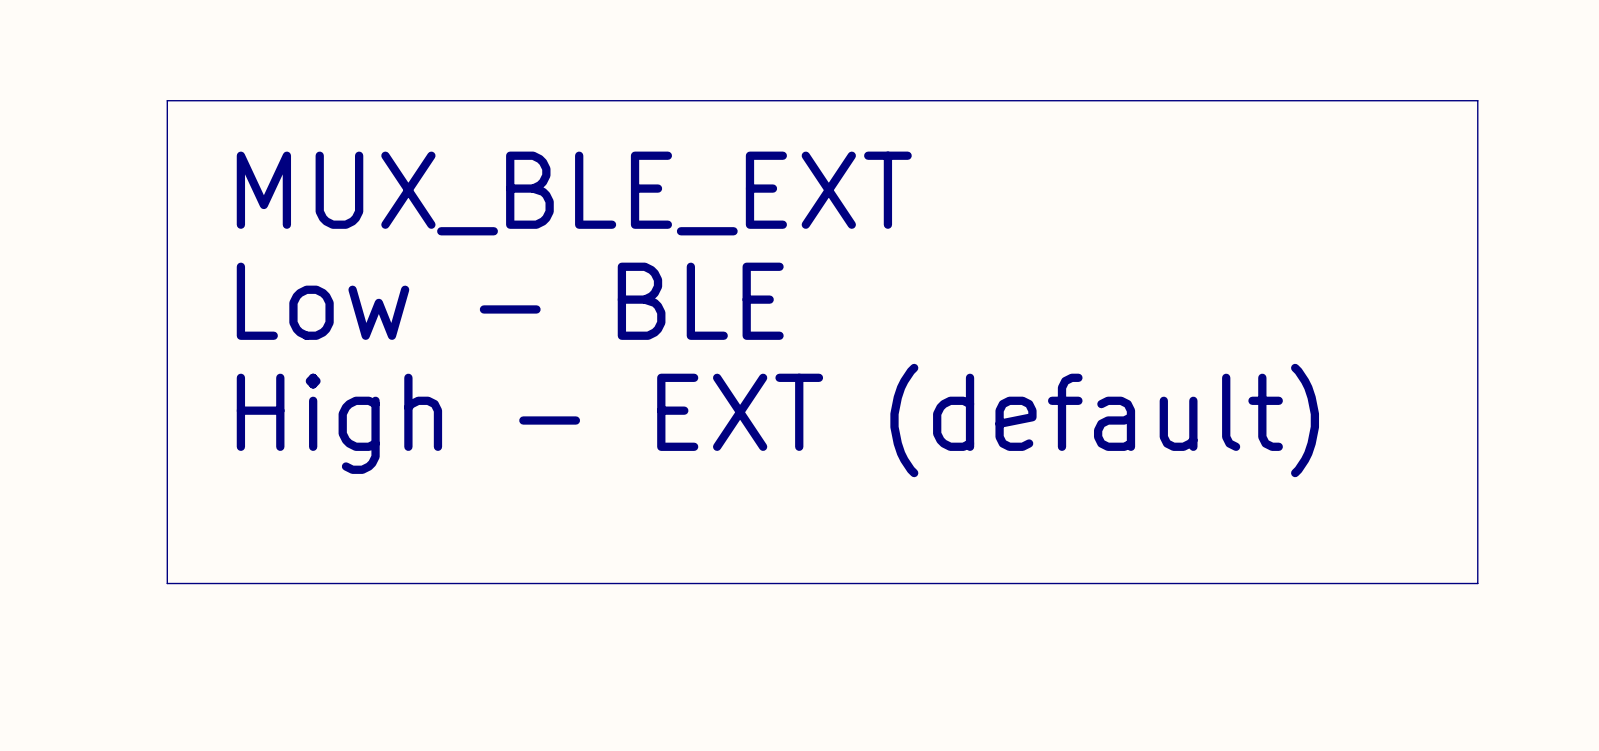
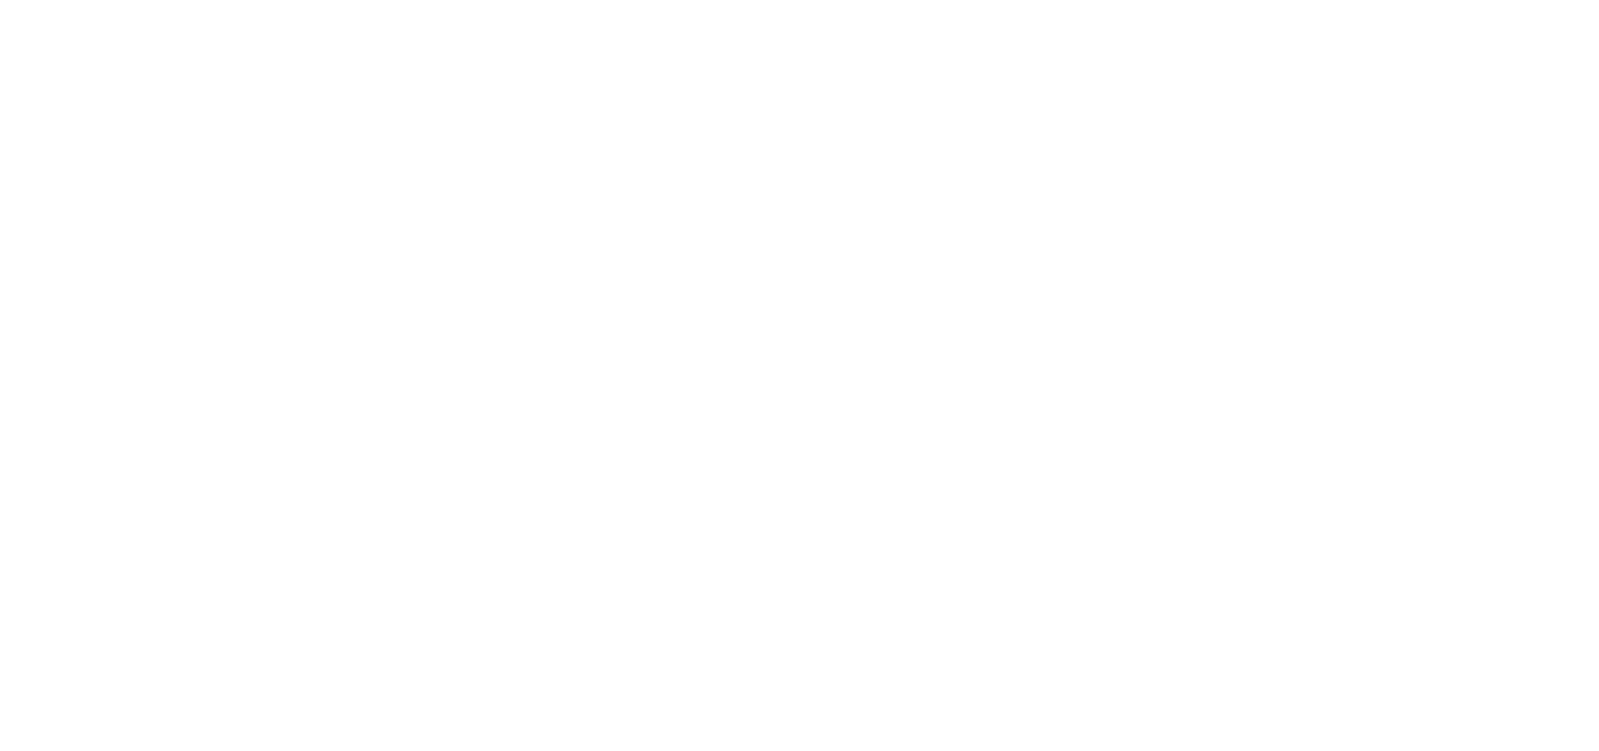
line: (167, 100) (1477, 100) (1477, 583) (167, 583) (167, 100) -> none
text: MUX_BLE_EXT (574, 193) -> none
text: Low - BLE (510, 301) -> none
text: High - EXT (default) (777, 420) -> none

